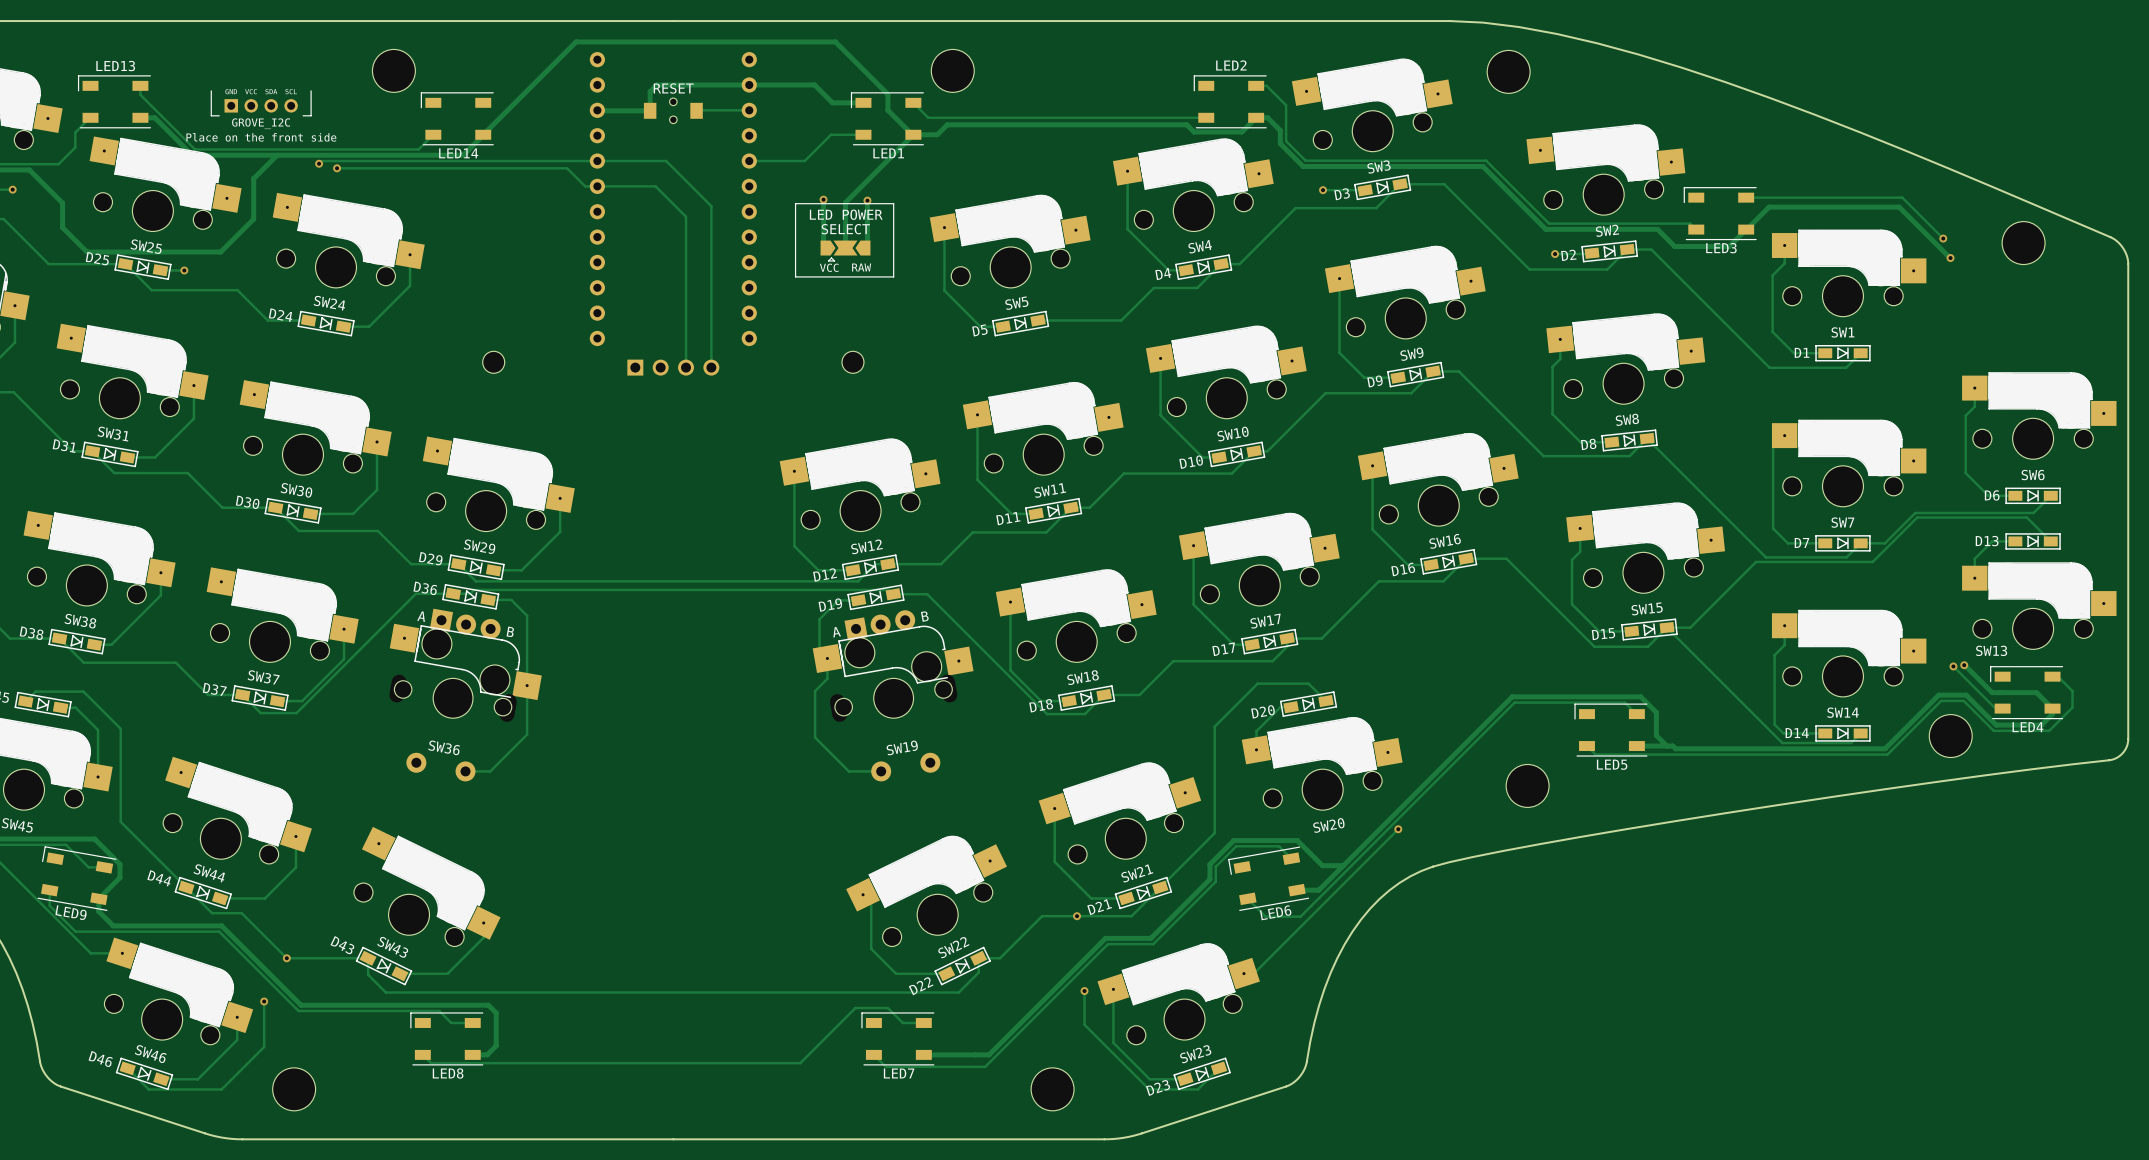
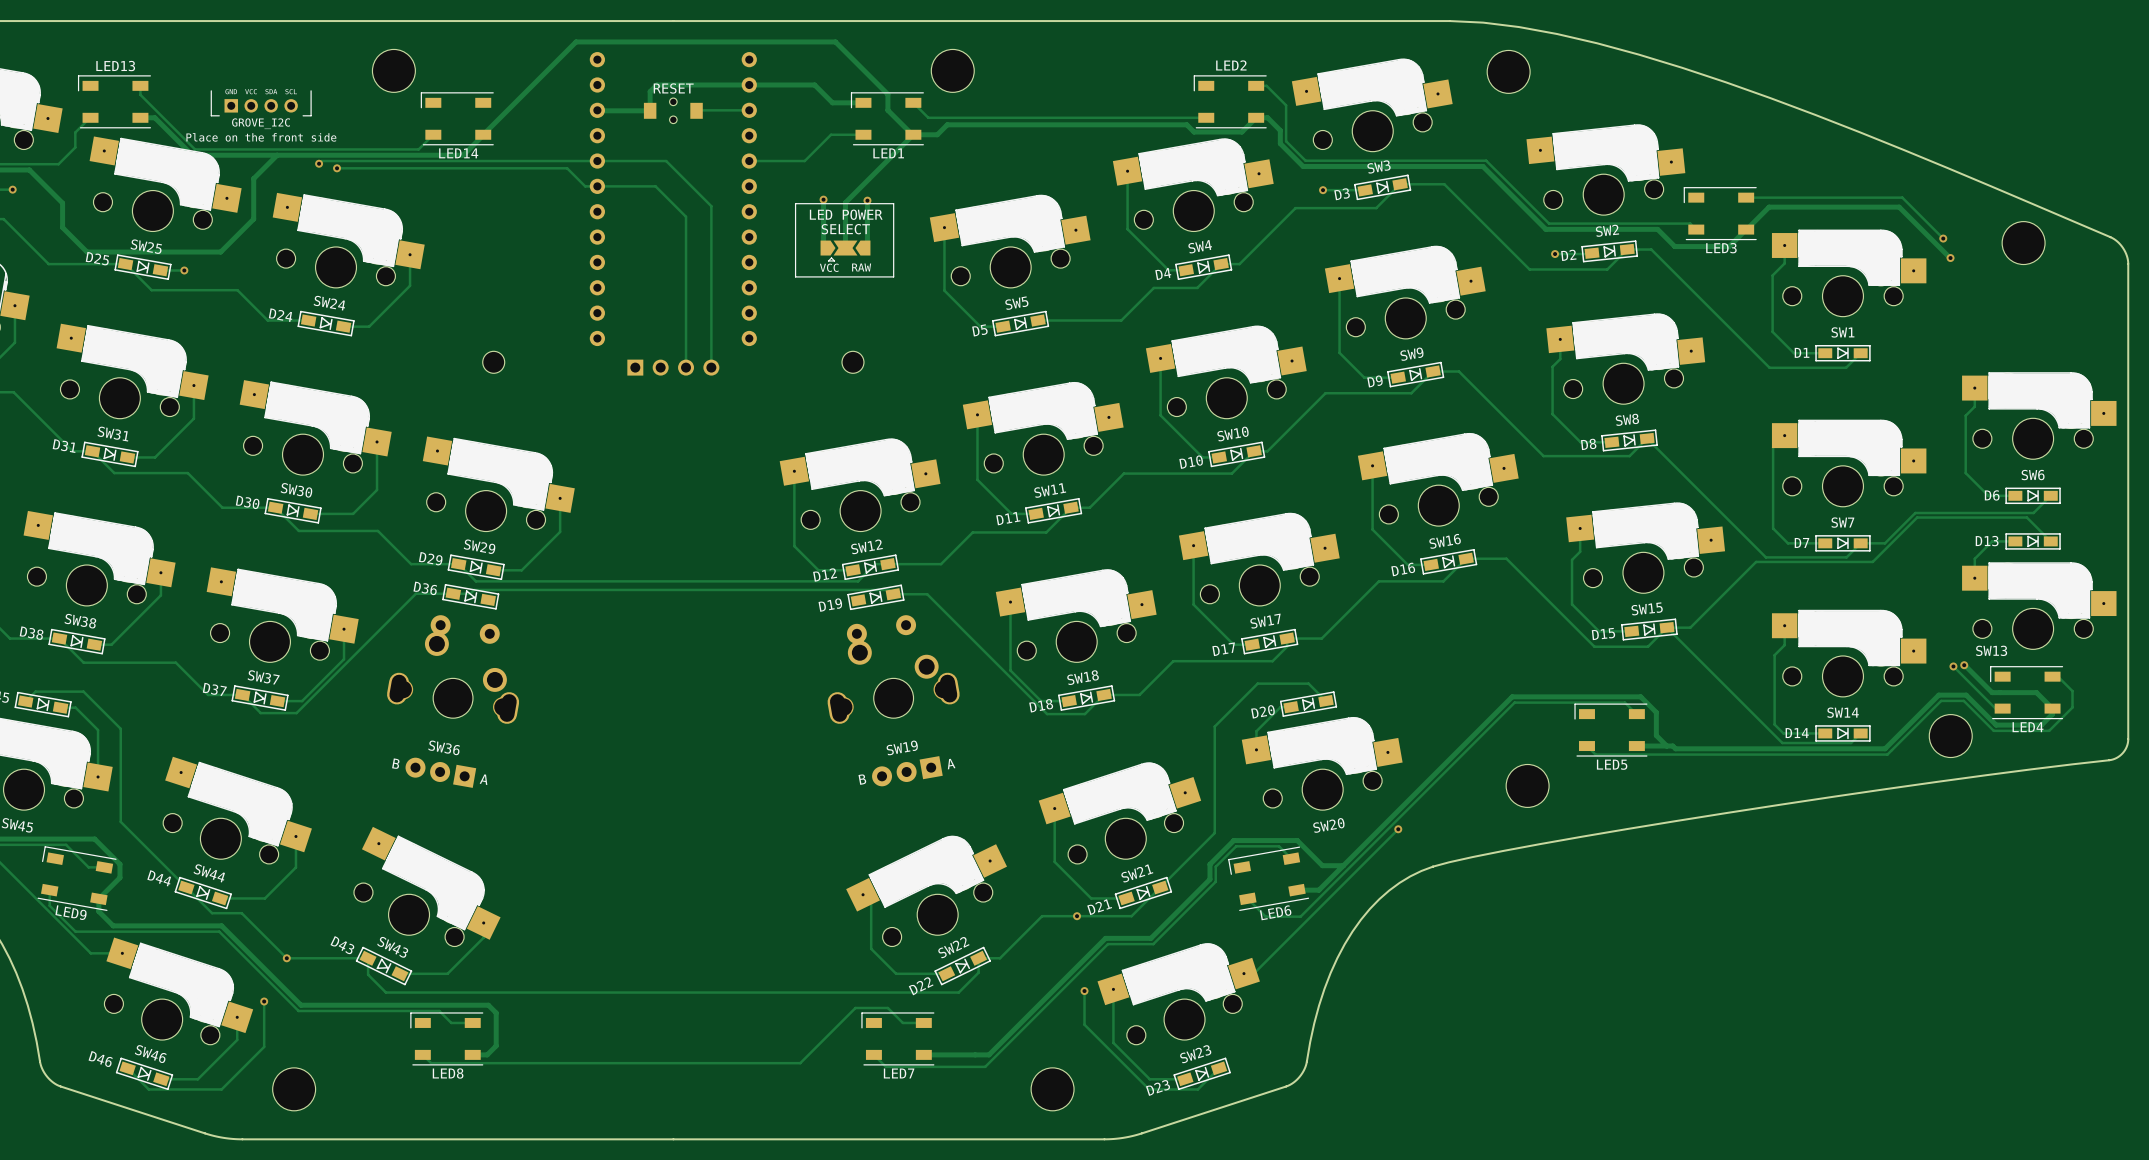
track: (488, 599) (511, 599) (527, 615) (527, 734) (490, 771) (465, 771) -> none
track: (858, 600) (838, 600) (819, 619) (819, 650) (827, 658) (827, 678) (815, 691) (815, 737) (848, 771) (881, 771) -> none
SW36 footprint: [389, 608, 542, 782] -> [387, 615, 520, 788]
SW19 footprint: [812, 610, 974, 782] -> [827, 615, 960, 787]

